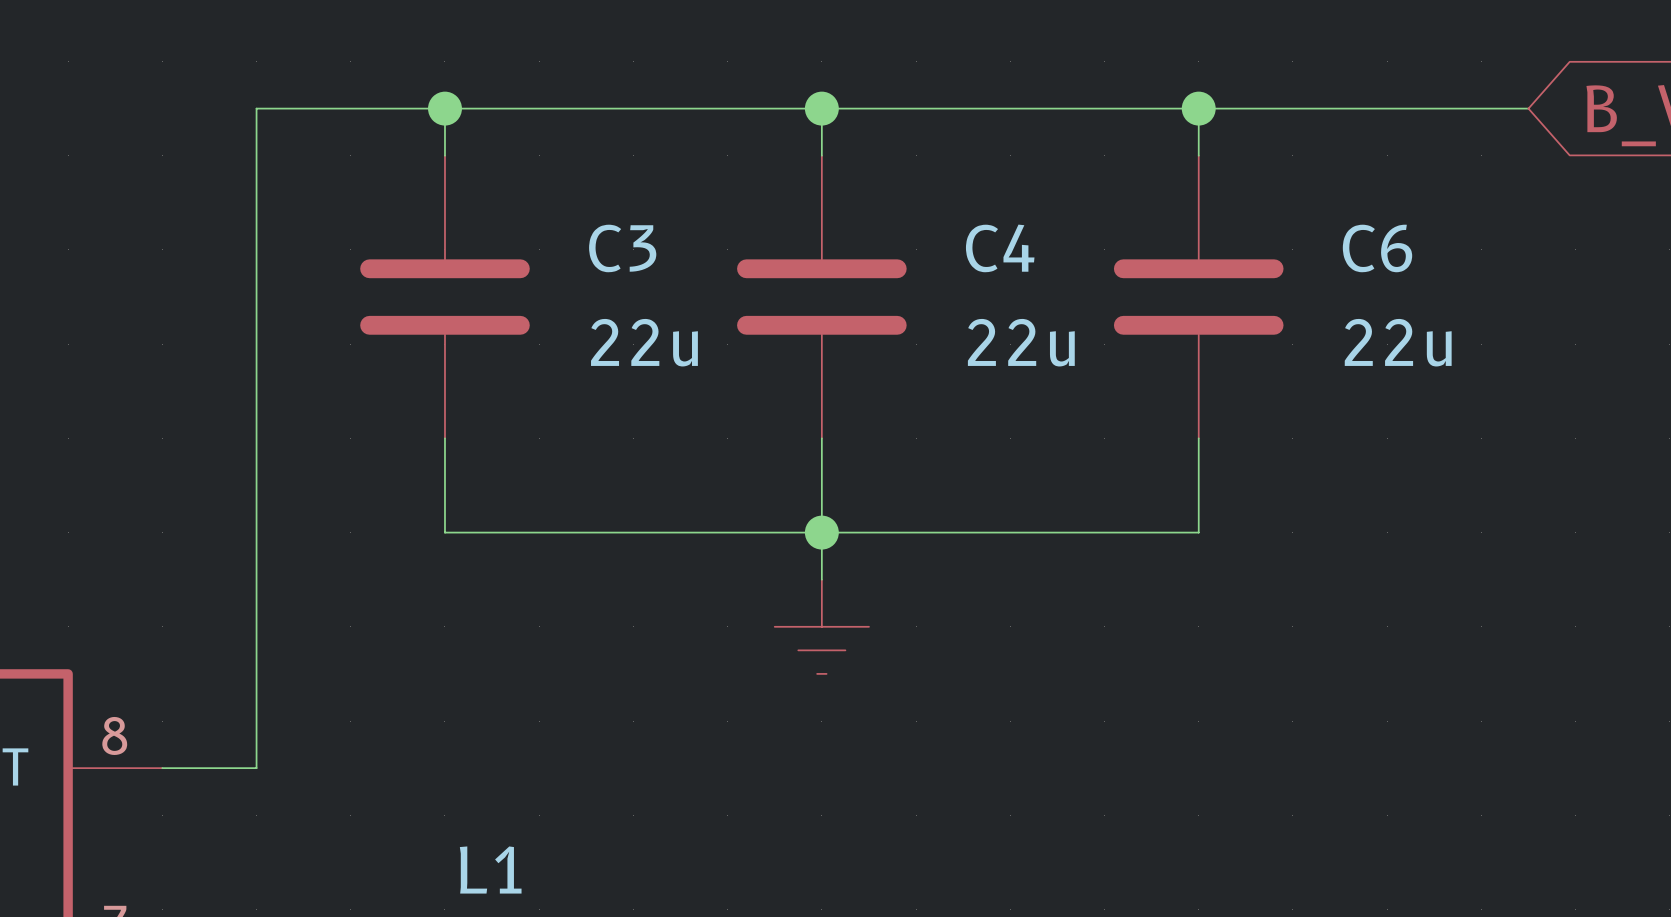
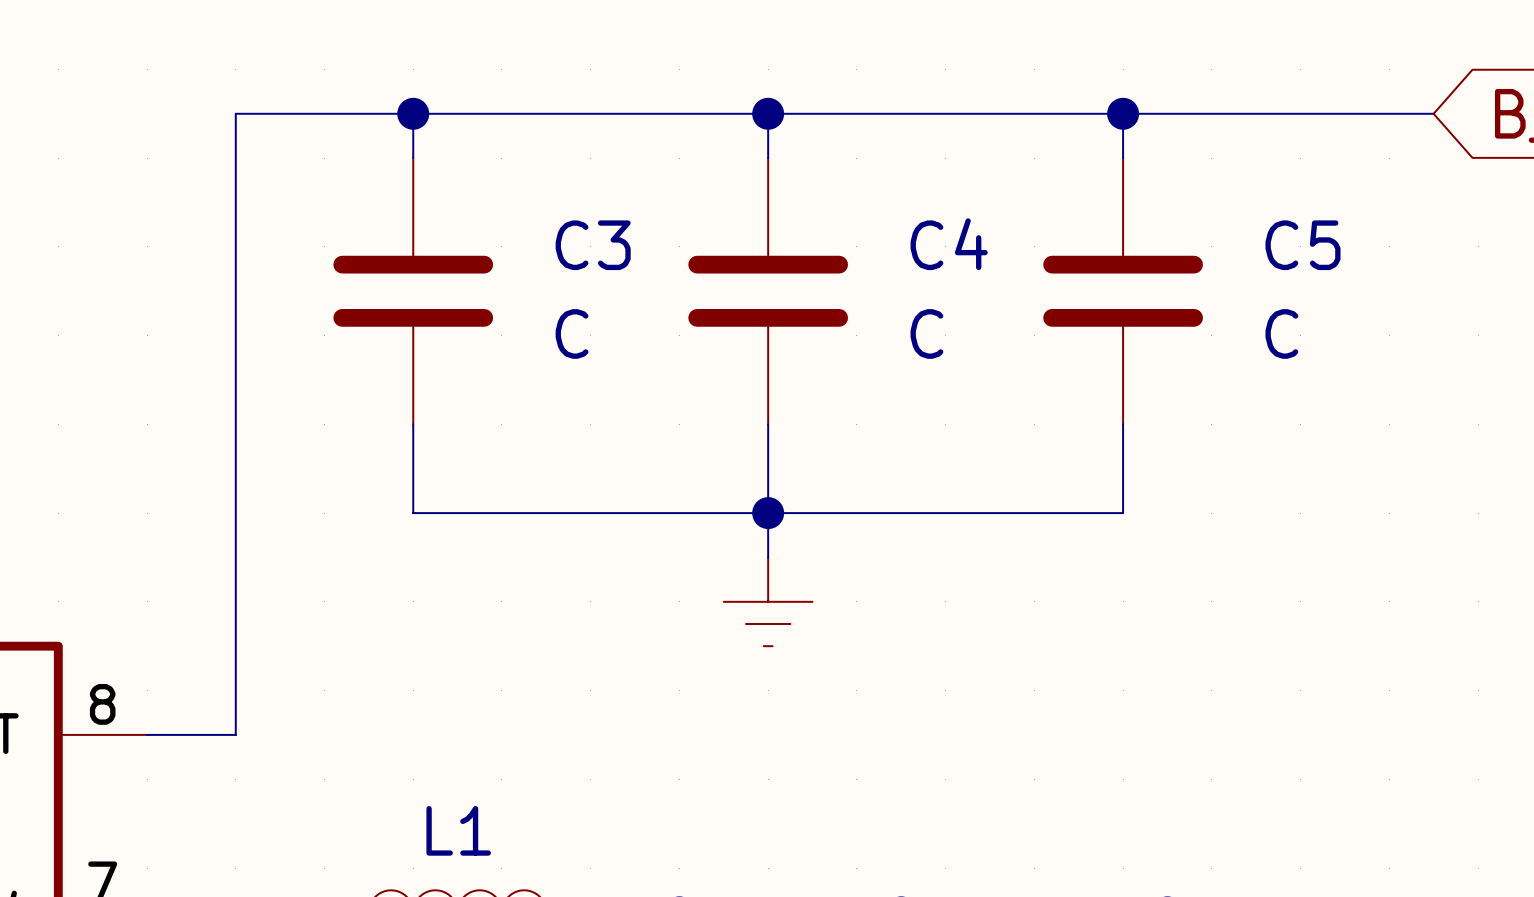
C6 name: C6 (1377, 248) -> C5 (1303, 245)
C3 value: 22u (644, 342) -> C (572, 333)
C4 value: 22u (1021, 342) -> C (926, 333)
C6 value: 22u (1398, 342) -> C (1281, 333)

